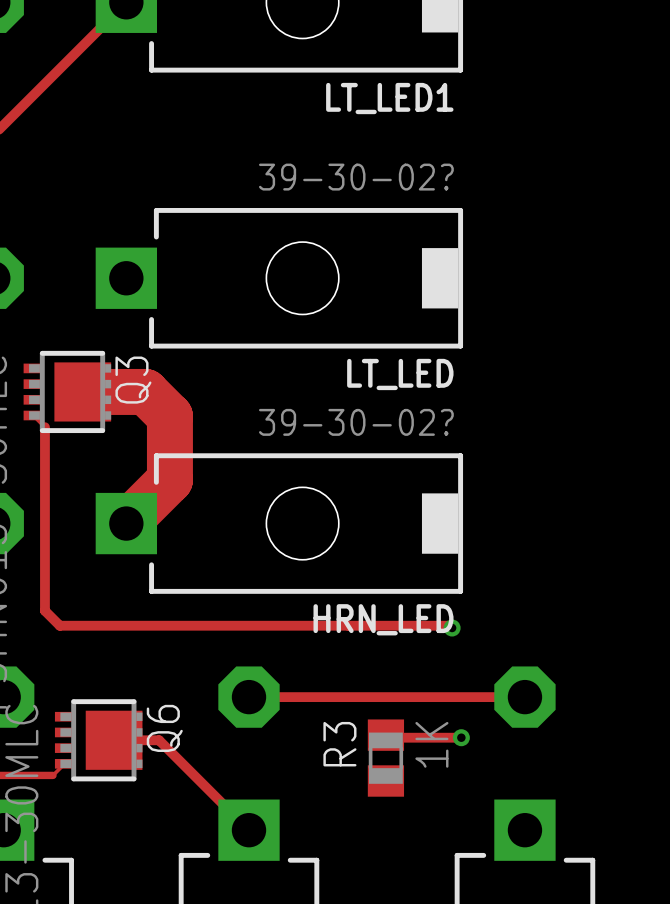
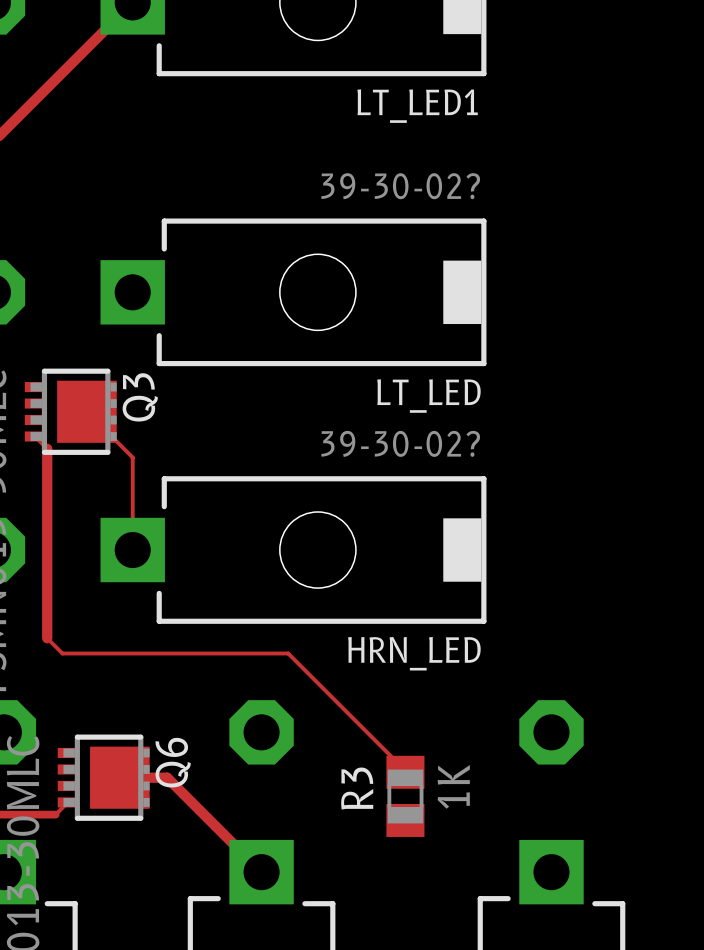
track: (82, 391) (145, 391) (169, 416) (169, 479) (126, 523) -> (86, 411) (132, 457) (132, 550)
track: (44, 607) (44, 610) (59, 625) (449, 625) (452, 627) -> (47, 638) (62, 653) (288, 653) (405, 772)
via: (452, 627) -> none
track: (248, 697) (524, 697) -> none
track: (385, 735) (388, 737) (461, 737) -> none
via: (461, 737) -> none

